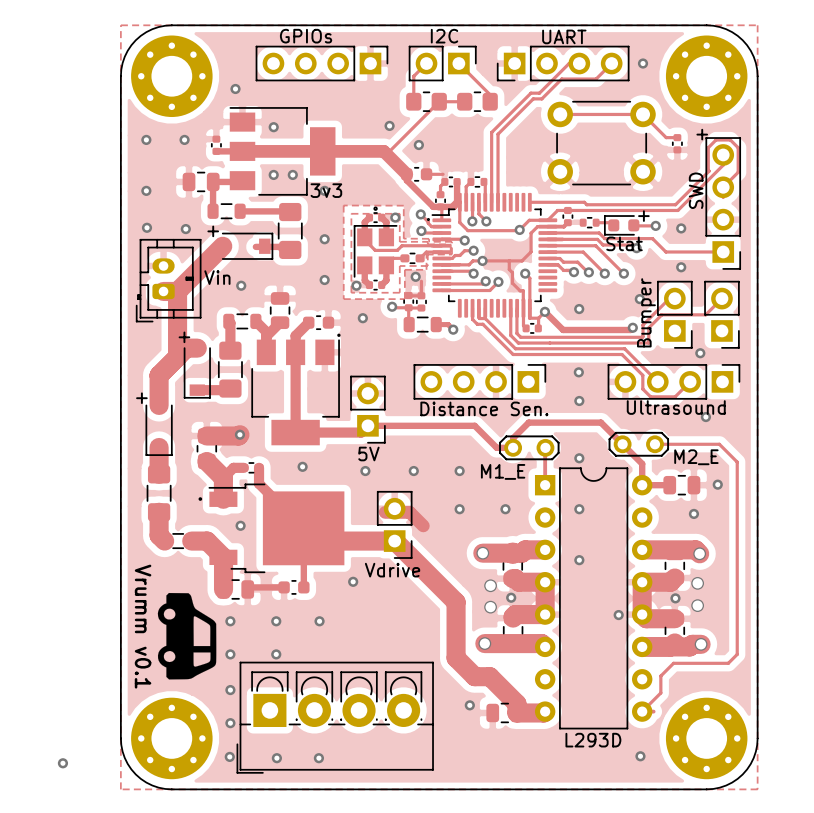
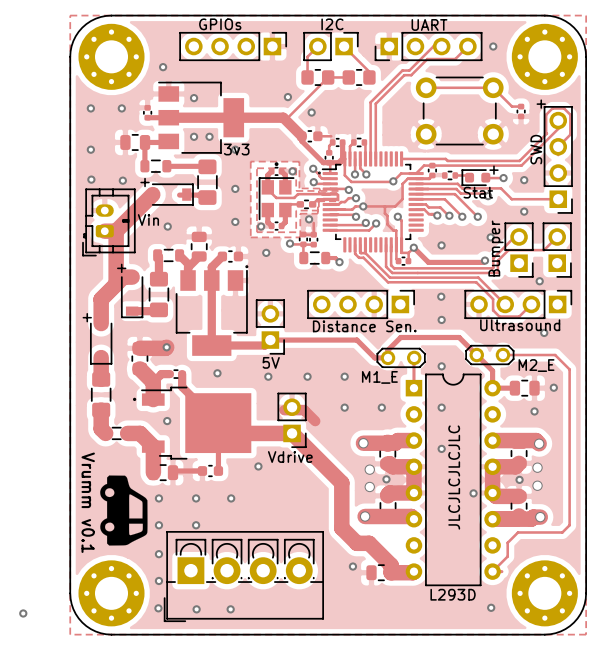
text: none -> JLCJLCJLCJLC (454, 477)

